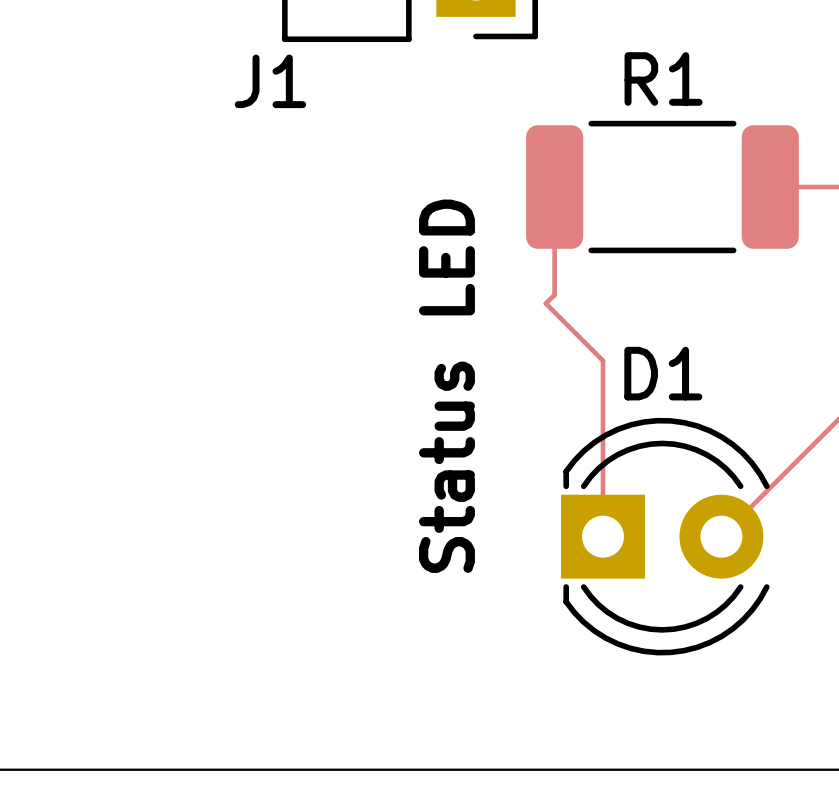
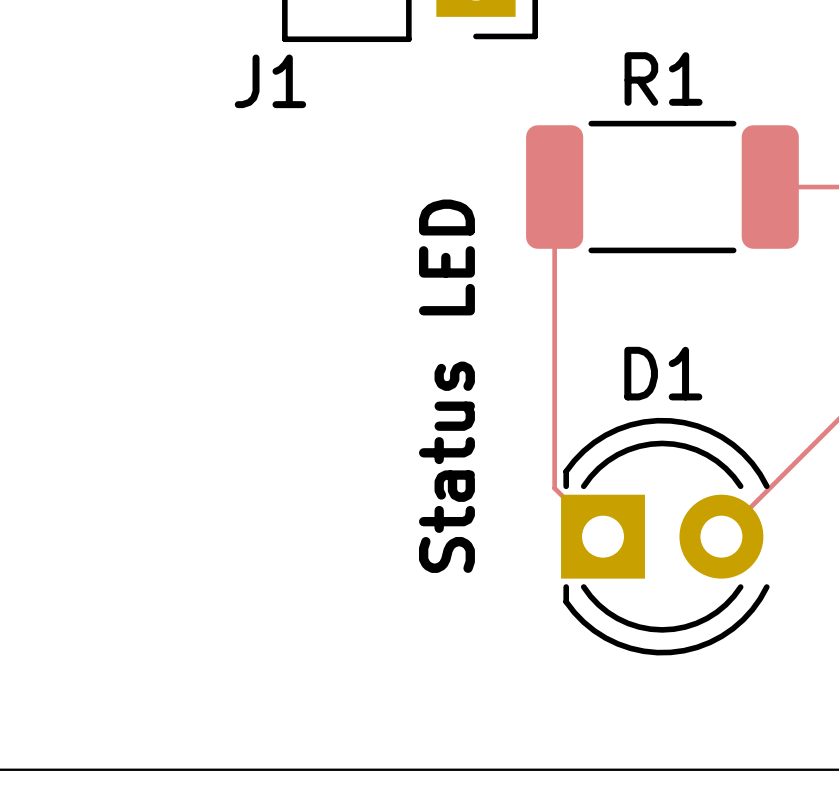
top track: (554, 294) (545, 303) (603, 360) (603, 536) -> (554, 294) (554, 488) (603, 536)

